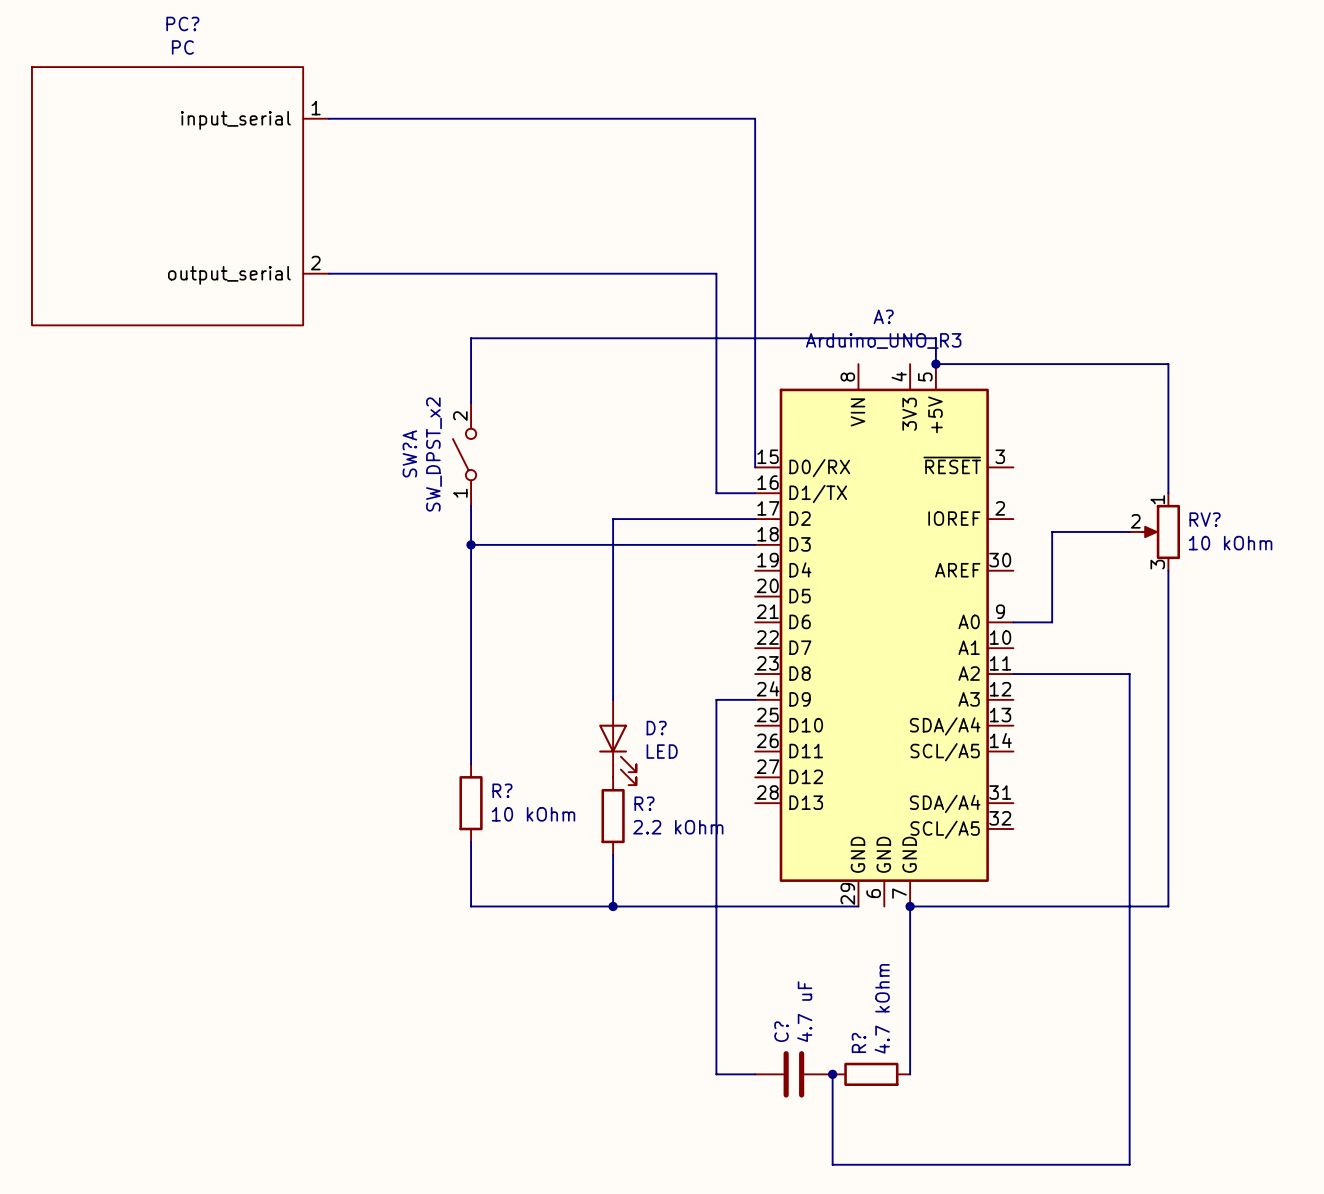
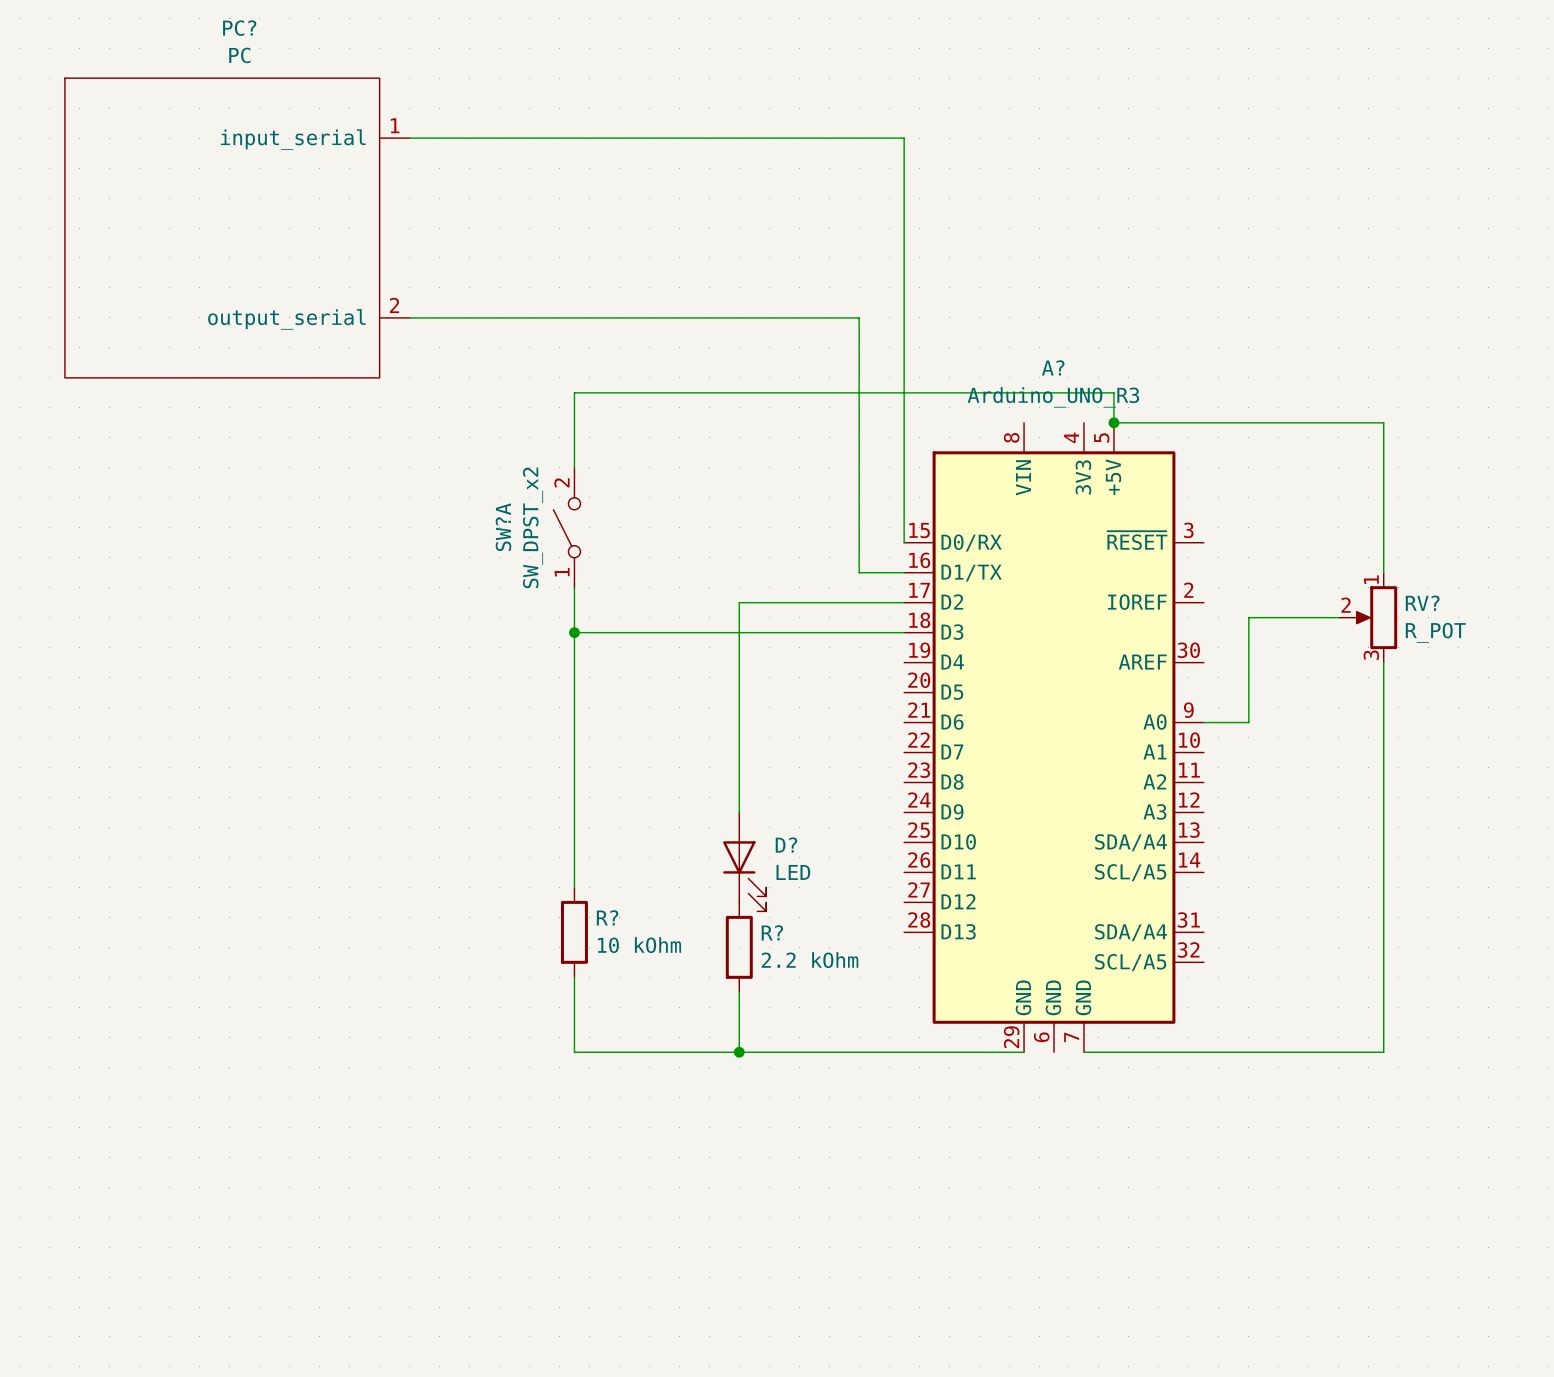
RV? value: 10 kOhm (1230, 543) -> R_POT (1435, 632)
wire: (1013, 674) (1129, 674) (1129, 1164) (832, 1164) (832, 1074) -> none
wire: (755, 699) (716, 699) (716, 1074) (755, 1074) -> none
wire: (910, 906) (910, 1074) -> none
junction: (910, 906) -> none
C?: 4.7 uF (793, 1074) -> none
junction: (832, 1074) -> none
R?: 4.7 kOhm (871, 1074) -> none

